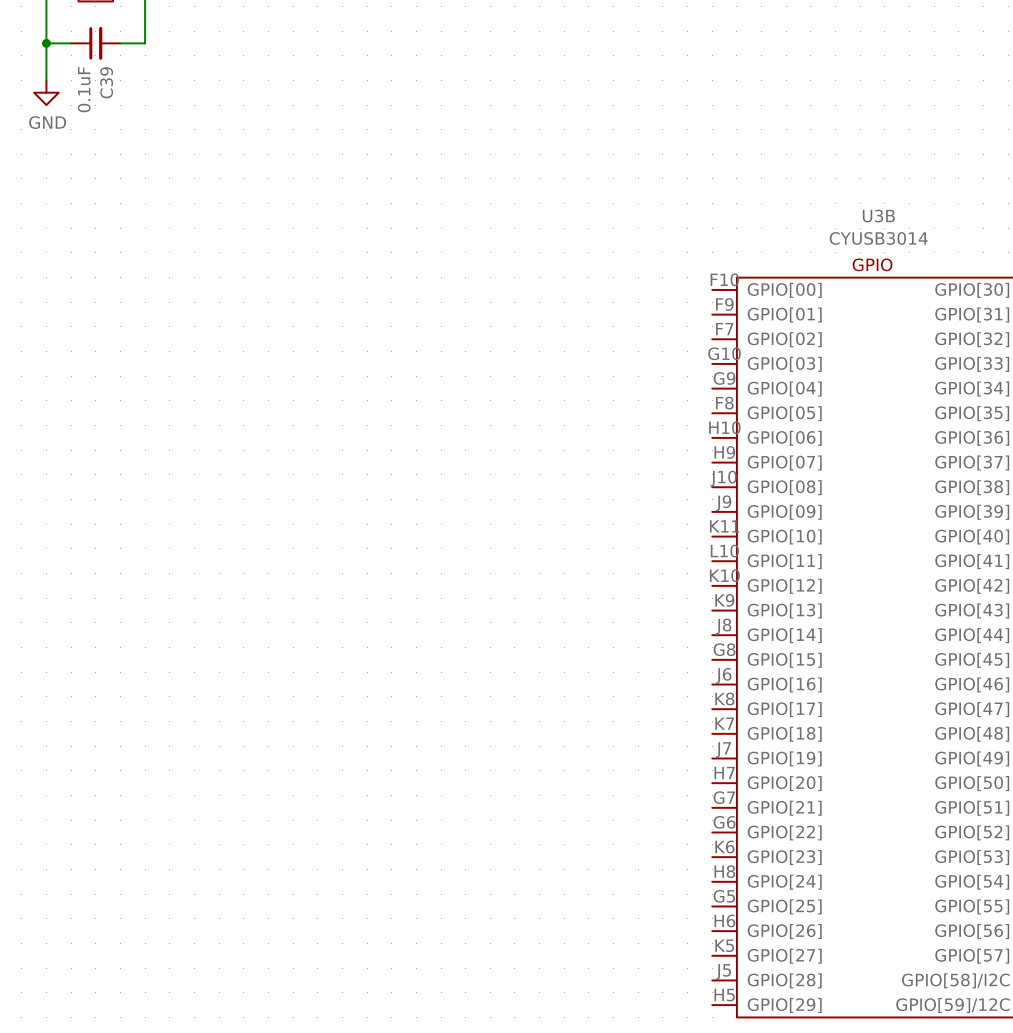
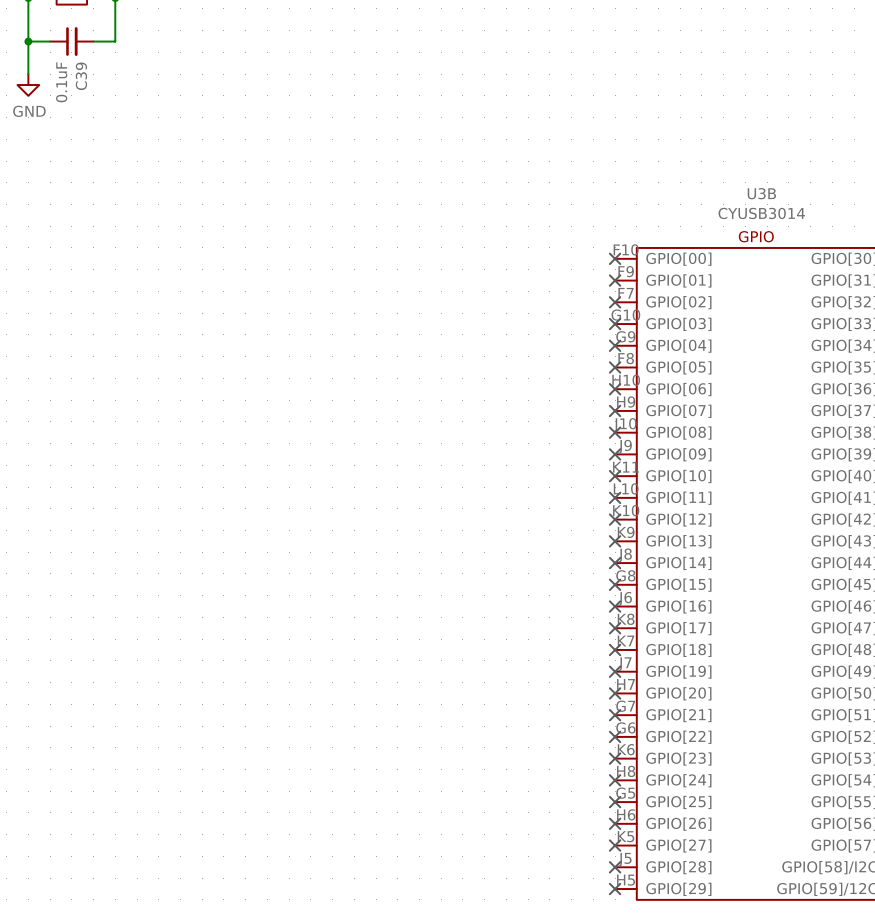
no-connect mark: none -> (615, 258)
no-connect mark: none -> (615, 280)
no-connect mark: none -> (615, 302)
no-connect mark: none -> (615, 324)
no-connect mark: none -> (615, 345)
no-connect mark: none -> (615, 367)
no-connect mark: none -> (615, 389)
no-connect mark: none -> (615, 410)
no-connect mark: none -> (615, 432)
no-connect mark: none -> (615, 454)
no-connect mark: none -> (615, 476)
no-connect mark: none -> (615, 497)
no-connect mark: none -> (615, 519)
no-connect mark: none -> (615, 541)
no-connect mark: none -> (615, 563)
no-connect mark: none -> (615, 584)
no-connect mark: none -> (615, 606)
no-connect mark: none -> (615, 628)
no-connect mark: none -> (615, 649)
no-connect mark: none -> (615, 671)
no-connect mark: none -> (615, 693)
no-connect mark: none -> (615, 715)
no-connect mark: none -> (615, 736)
no-connect mark: none -> (615, 758)
no-connect mark: none -> (615, 780)
no-connect mark: none -> (615, 802)
no-connect mark: none -> (615, 823)
no-connect mark: none -> (615, 845)
no-connect mark: none -> (615, 867)
no-connect mark: none -> (615, 889)

